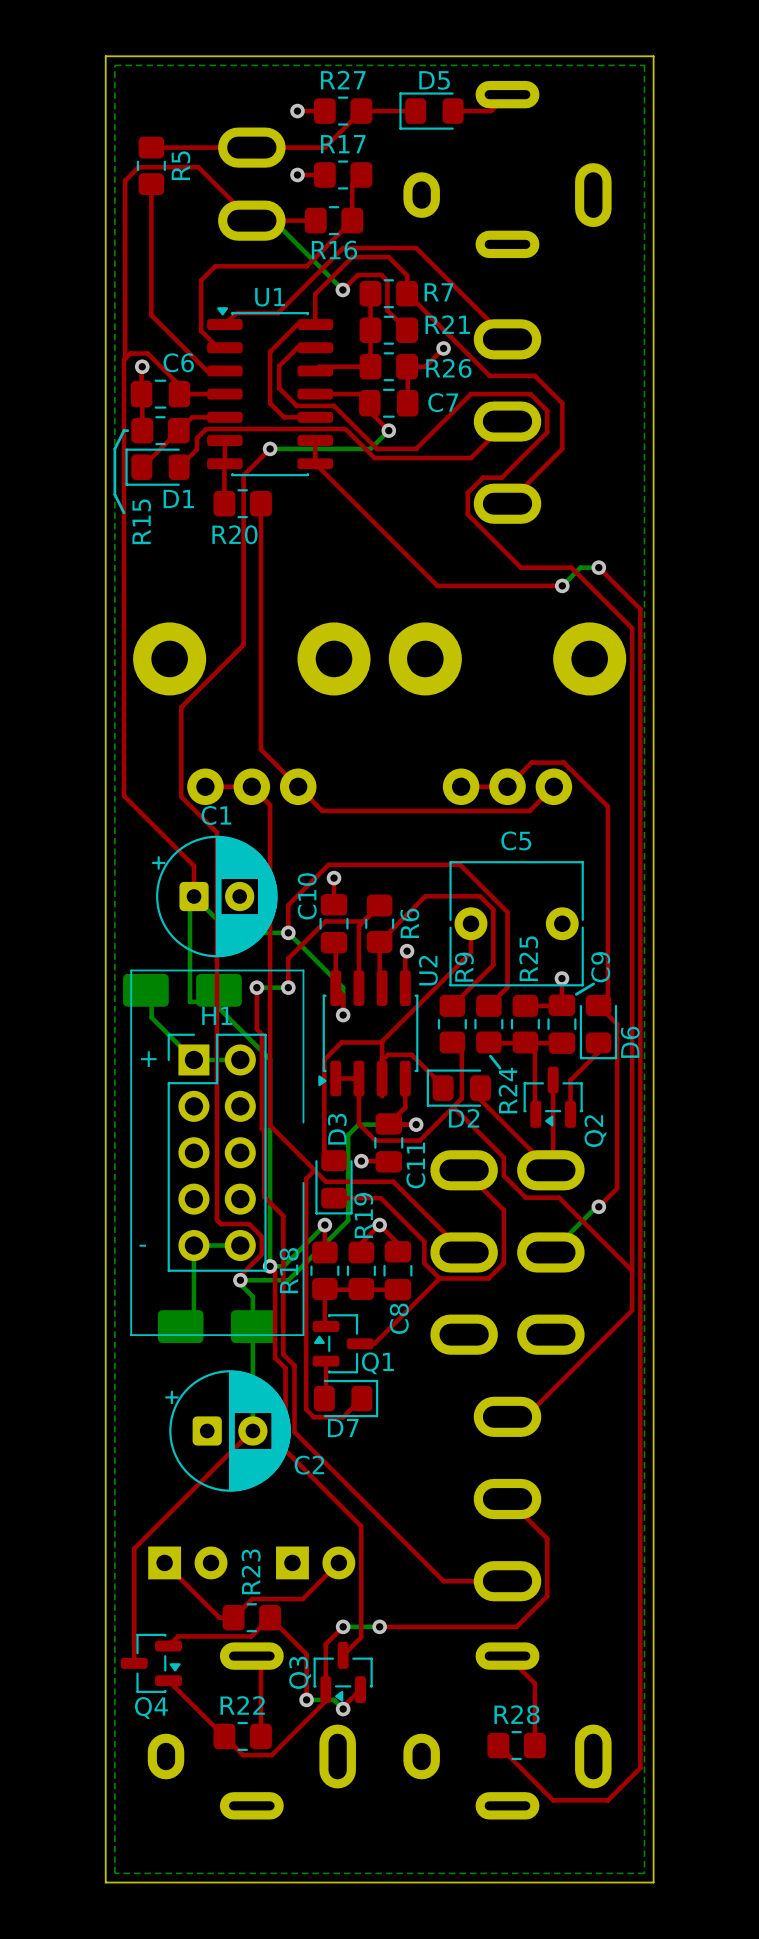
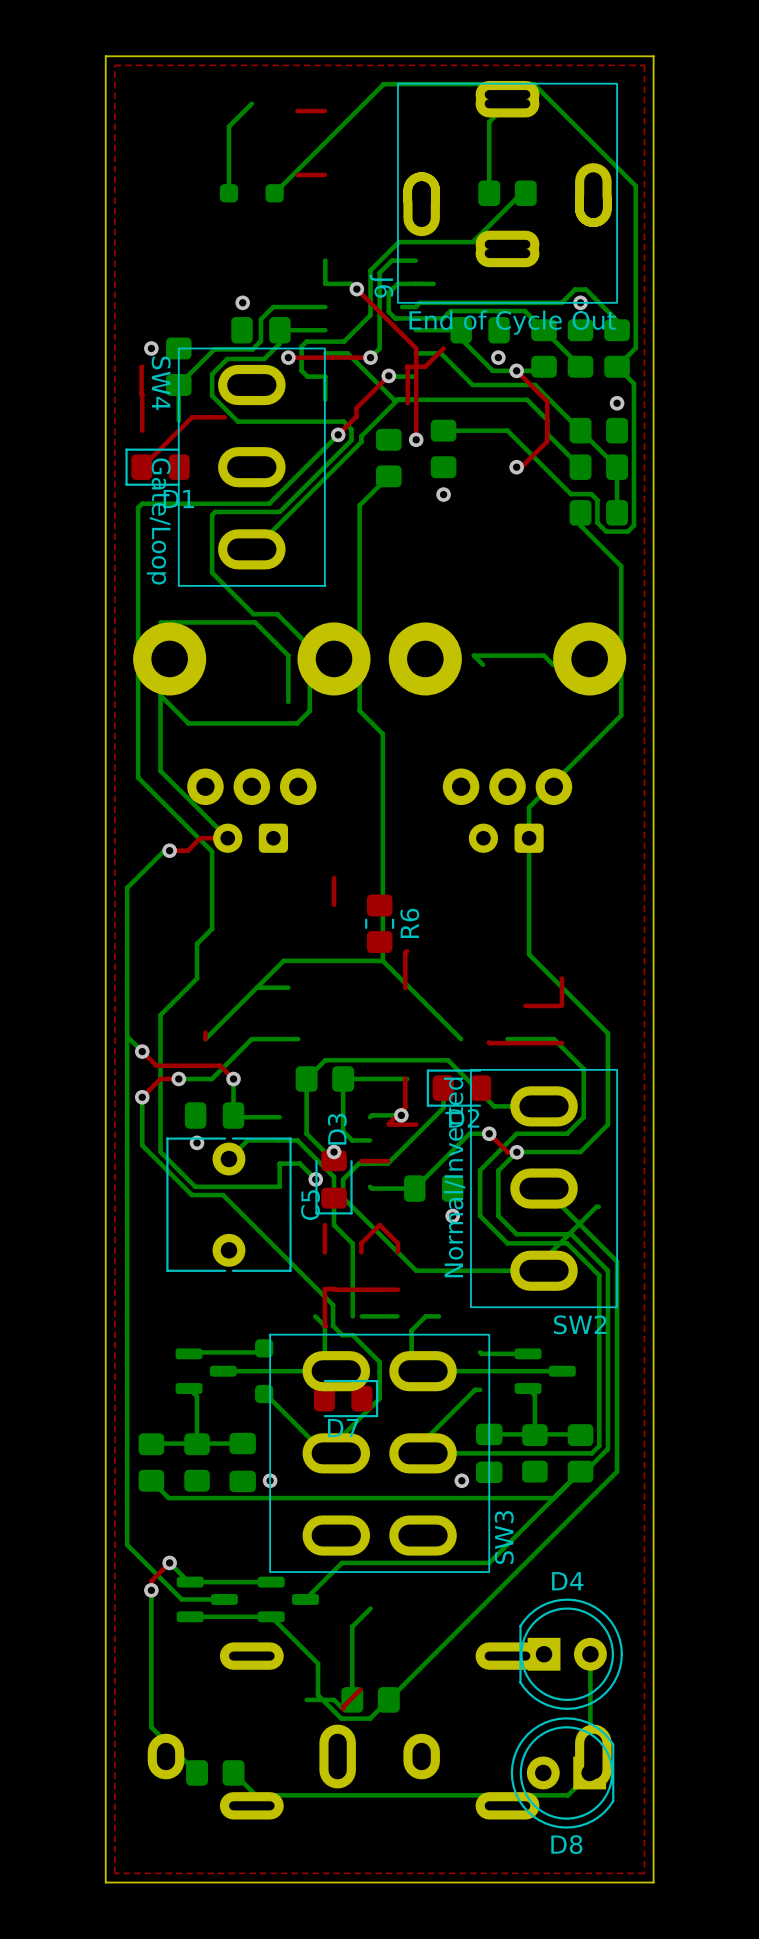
bottom zone outline: (114, 65) (644, 65) (644, 1873) (114, 1873) (114, 65) -> none
top zone outline: none -> (114, 65) (644, 65) (644, 1873) (114, 1873) (114, 65)
top track: (507, 94) (491, 111) (453, 111) -> none
bottom track: none -> (251, 103) (229, 126) (229, 193)
bottom track: none -> (507, 103) (489, 122) (489, 193)
via: (297, 111) -> none
R27 side: top (343, 111) -> bottom (443, 448)
top track: (415, 111) (361, 111) (324, 147) (151, 147) -> none
D5: (431, 111) -> none
part footprint: [218, 127, 286, 241] -> [219, 184, 284, 203]
R5: (151, 165) -> none
via: (297, 174) -> none
R17 side: top (343, 174) -> bottom (580, 348)
top track: (361, 174) (352, 184) (352, 220) (306, 266) (215, 266) (201, 280) (201, 330) (217, 347) (224, 347) -> none
top track: (151, 184) (151, 315) (207, 370) (224, 370) -> none
bottom track: none -> (274, 193) (383, 84) (533, 84) (635, 186) (635, 348) (617, 366) (633, 383) (633, 525) (627, 531) (606, 531) (597, 522) (597, 500) (591, 494) (570, 494) (507, 430) (443, 430)
J6: none -> End of Cycle Out (507, 193)
part: none -> (507, 193)
bottom track: none -> (525, 193) (521, 193) (472, 242) (398, 242) (370, 270) (370, 315) (344, 341) (306, 341) (301, 346) (301, 370) (307, 376) (325, 376) (325, 399)
bottom track: (251, 220) (273, 220) (342, 289) -> none
top track: (315, 220) (251, 220) (198, 167) (138, 167) (125, 180) (125, 358) -> none
R16 side: top (334, 220) -> bottom (544, 348)
bottom track: none -> (325, 260) (325, 283) (351, 283) (356, 289)
bottom track: none -> (415, 260) (391, 260) (379, 272) (379, 348) (370, 357)
bottom track: none -> (433, 283) (397, 283) (388, 292) (388, 311) (395, 318) (443, 318) (450, 311) (524, 311) (580, 366)
via position: (342, 289) -> (356, 289)
top track: none -> (356, 289) (416, 348) (416, 439)
top track: (343, 293) (342, 289) (357, 274) (381, 274) (387, 281) (387, 310) (407, 330) -> none
top track: (370, 293) (370, 366) (319, 366) (315, 370) -> none
R7 side: top (388, 293) -> bottom (598, 467)
via: none -> (242, 302)
via: none -> (580, 302)
bottom track: none -> (325, 307) (273, 307) (260, 319) (260, 341) (252, 349) (214, 349) (178, 385) (178, 420)
bottom track: none -> (402, 307) (415, 307) (419, 302) (561, 302) (575, 289) (586, 289) (617, 320) (617, 330)
top track: (224, 324) (236, 313) (278, 313) (343, 248) (416, 248) (507, 339) -> none
bottom track: none -> (325, 330) (279, 330) (279, 343) (264, 358) (227, 358) (212, 374) (212, 395) (237, 421) (343, 421) (351, 429) (351, 440) (279, 511) (215, 511) (212, 515) (212, 572) (253, 614) (277, 614) (309, 646) (309, 710) (297, 723) (188, 723) (160, 695) (160, 770) (227, 838)
R21 side: top (388, 330) -> bottom (598, 512)
bottom track: none -> (415, 330) (461, 330) (461, 339) (492, 370) (539, 370) (544, 366)
top track: (315, 347) (297, 347) (279, 366) (279, 388) (296, 405) (334, 405) (377, 448) (416, 448) (470, 394) (530, 394) (547, 410) -> (516, 370) (547, 401) (547, 410)
via: (443, 348) -> none
part: none -> (617, 348)
bottom track: none -> (325, 353) (347, 353) (394, 399) (527, 399) (547, 419) (547, 433) (580, 467)
bottom track: none -> (415, 353) (441, 353) (472, 385) (534, 385) (617, 467)
top track: none -> (288, 357) (370, 357)
via: none -> (288, 357)
via: none -> (370, 357)
via: none -> (498, 357)
via position: (142, 366) -> (151, 348)
R26 side: top (388, 366) -> bottom (598, 430)
via: none -> (516, 370)
top track: none -> (388, 375) (356, 408) (356, 416) (338, 434)
bottom track: none -> (388, 375) (415, 376)
via: none -> (388, 375)
U1: (270, 391) -> none
C6 side: top (160, 394) -> bottom (480, 330)
top track: (224, 394) (179, 394) (179, 385) (147, 353) (130, 353) (123, 359) (123, 795) (194, 865) (194, 896) -> none
top track: (315, 394) (360, 394) (369, 403) (369, 411) (388, 430) -> none
bottom track: none -> (397, 399) (361, 436) (361, 442) (254, 549) (251, 549)
C7 side: top (388, 403) -> bottom (260, 330)
via: none -> (617, 403)
top track: (315, 417) (284, 417) (270, 403) (270, 351) (297, 324) (315, 324) (315, 294) (352, 257) (388, 257) (407, 275) (407, 293) (489, 375) (534, 375) (562, 403) (562, 448) (507, 503) -> none
top track: (507, 421) (470, 458) (374, 458) (345, 429) (206, 429) (197, 438) (197, 449) (179, 467) -> none
SW4 side: bottom (507, 421) -> top (251, 467)
line: (127, 430) (123, 430) (114, 448) (114, 494) (123, 512) -> none
R15 side: top (160, 430) -> bottom (178, 366)
bottom track: (388, 430) (370, 448) (270, 448) -> none
via: (388, 430) -> none
top track: (547, 432) (501, 477) (483, 477) (467, 492) (467, 514) (520, 567) (571, 567) (632, 628) (632, 1310) (525, 1416) (507, 1416) -> (547, 432) (547, 441) (521, 467) (516, 467)
bottom track: none -> (338, 434) (269, 503) (142, 503) (138, 507) (138, 777) (212, 851) (212, 928) (197, 943) (197, 978) (160, 1015) (160, 1152) (195, 1186) (279, 1186) (279, 1163) (299, 1163) (315, 1179)
via: none -> (338, 434)
via: none -> (416, 439)
top track: (224, 440) (224, 503) -> none
top track: (315, 440) (315, 463) (437, 585) (562, 585) -> none
top track: (270, 448) (243, 475) (243, 645) (181, 707) (181, 796) (216, 832) (216, 1219) (221, 1224) (249, 1224) (261, 1236) (261, 1254) (240, 1275) (240, 1280) -> none
via: (270, 448) -> none
bottom track: none -> (617, 460) (617, 503)
via: none -> (516, 467)
bottom track: none -> (388, 476) (359, 505) (359, 710) (382, 734) (382, 960)
via: none -> (443, 494)
R20 side: top (242, 503) -> bottom (388, 458)
top track: (260, 503) (260, 749) (322, 810) (529, 810) (553, 786) -> none
bottom track: none -> (580, 512) (580, 525) (621, 566) (621, 715) (529, 807) (529, 954) (607, 1033) (607, 1124) (580, 1152) (517, 1152) (498, 1170) (498, 1215) (516, 1234) (571, 1234) (607, 1270) (607, 1448) (585, 1471) (580, 1471) (489, 1562) (342, 1562) (305, 1599)
top track: (598, 567) (640, 609) (640, 1767) (607, 1800) (553, 1800) (498, 1745) -> none
bottom track: (598, 567) (580, 567) (562, 585) -> none
via: (598, 567) -> none
via: (562, 585) -> none
bottom track: none -> (160, 622) (255, 622) (288, 655) (288, 702)
bottom track: none -> (483, 664) (473, 655) (544, 655) (553, 664) (598, 664)
top track: (205, 786) (251, 786) (270, 805) (270, 1125) (314, 1170) -> none
top track: (461, 786) (507, 786) (531, 762) (563, 762) (607, 806) (607, 1005) -> none
top track: none -> (227, 838) (200, 838) (187, 850) (169, 850)
part: none -> (250, 838)
bottom track: none -> (169, 850) (164, 850) (127, 887) (127, 1544) (181, 1599) (224, 1599)
via: none -> (169, 850)
via: (334, 878) -> none
C1 side: top (214, 896) -> bottom (506, 838)
top track: (379, 905) (358, 926) (358, 988) -> none
top track: (363, 921) (325, 921) (288, 958) (288, 987) -> none
C10 side: top (334, 923) -> bottom (433, 1188)
top track: (470, 923) (470, 952) (382, 1041) (382, 1096) -> none
C5 rotation: 0° (516, 923) -> 90° clockwise (228, 1204)
C5 position: (516, 923) -> (228, 1204)
top track: (288, 932) (288, 905) (328, 864) (460, 864) (507, 912) (507, 987) (488, 1005) -> none
via: (288, 932) -> none
top track: (334, 942) (335, 944) (335, 988) (343, 995) (343, 1015) -> none
via: (407, 951) -> none
bottom track: none -> (382, 960) (283, 960) (205, 1039)
bottom track: none -> (382, 960) (461, 1039)
via: (561, 978) -> none
line: (593, 983) (576, 994) -> none
top track: (256, 987) (251, 987) (256, 992) (256, 1029) (261, 1034) (264, 1196) (283, 1215) (283, 1354) (294, 1365) (294, 1432) (443, 1581) (507, 1581) -> none
via: (256, 987) -> none
via: (288, 987) -> none
top track: (382, 988) (379, 985) (379, 942) (425, 896) (480, 896) (493, 909) (493, 964) (452, 1005) (461, 1005) -> none
part: (182, 990) -> none
bottom track: (151, 1001) (151, 1017) (193, 1059) (240, 1059) -> none
top track: (598, 1005) (617, 1024) (617, 1188) (598, 1206) -> none
bottom track: (343, 1015) (343, 987) (288, 932) (230, 932) (194, 896) (190, 900) (190, 1001) (212, 1001) (270, 1059) (270, 1266) (283, 1266) (324, 1225) -> none
via: (343, 1015) -> none
R9 side: top (452, 1024) -> bottom (324, 1078)
R24: (488, 1024) -> none
R25: (525, 1024) -> none
C9: (561, 1024) -> none
D6: (598, 1027) -> none
top track: none -> (205, 1032) (205, 1039)
U2: (368, 1033) -> none
bottom track: none -> (127, 1036) (142, 1051)
bottom track: none -> (298, 1039) (251, 1039) (211, 1078) (178, 1078)
bottom track: none -> (507, 1039) (553, 1039) (583, 1068) (583, 1117) (567, 1133) (516, 1133) (480, 1170) (480, 1215) (507, 1243) (567, 1243) (599, 1275) (599, 1445) (591, 1453) (411, 1453) (475, 1389) (480, 1389)
top track: (382, 1042) (341, 1042) (324, 1059) (324, 1151) (334, 1160) -> none
top track: (461, 1042) (461, 1098) (419, 1140) (375, 1140) (358, 1123) (358, 1078) (335, 1078) -> none
top track: (534, 1042) (535, 1114) -> none
top track: (607, 1042) (570, 1080) (570, 1114) -> none
top track: none -> (142, 1051) (156, 1065) (220, 1065) (233, 1079)
via: none -> (142, 1051)
line: (490, 1056) (500, 1068) -> none
top track: (382, 1060) (388, 1054) (411, 1054) (443, 1088) -> none
top track: none -> (178, 1078) (160, 1078) (142, 1097)
via: none -> (178, 1078)
bottom track: none -> (407, 1078) (343, 1078) (343, 1131) (352, 1140) (370, 1140)
bottom track: none -> (233, 1079) (233, 1115) (235, 1117) (279, 1117)
via: none -> (233, 1079)
top track: (553, 1080) (553, 1168) (550, 1170) (480, 1099) (480, 1088) -> none
bottom track: none -> (443, 1088) (443, 1107) (387, 1163) (358, 1163) (343, 1179) (343, 1197) (416, 1270) (544, 1270)
bottom track: none -> (142, 1097) (142, 1145) (191, 1195) (223, 1195) (333, 1305) (333, 1325) (342, 1335) (352, 1335) (379, 1362) (379, 1398) (324, 1453) (270, 1398) (270, 1389)
via: none -> (142, 1097)
Q2 side: top (553, 1097) -> bottom (206, 1371)
bottom track: none -> (544, 1106) (494, 1106) (448, 1060) (325, 1060) (306, 1078) (306, 1133) (324, 1152) (334, 1152)
top track: (453, 1107) (503, 1157) (503, 1175) (525, 1197) (559, 1197) (632, 1270) -> none
bottom track: none -> (401, 1115) (371, 1115) (370, 1117)
bottom track: (416, 1124) (358, 1124) (348, 1135) (348, 1220) (288, 1280) (240, 1280) (240, 1284) (252, 1296) (252, 1430) -> none
via position: (416, 1124) -> (401, 1115)
top track: none -> (489, 1133) (507, 1152) (516, 1152)
bottom track: none -> (489, 1133) (469, 1133) (414, 1188) (371, 1188) (370, 1186)
via: none -> (489, 1133)
via: none -> (197, 1142)
C11 side: top (388, 1142) -> bottom (214, 1115)
H1: (217, 1152) -> none
via: none -> (334, 1152)
via: none -> (516, 1152)
bottom track: none -> (228, 1159) (247, 1140) (297, 1140) (334, 1176) (334, 1225) (352, 1243) (352, 1316)
via: (361, 1161) -> none
top track: (314, 1170) (306, 1178) (306, 1409) (314, 1417) (343, 1417) (361, 1398) -> none
top track: (314, 1170) (325, 1181) (393, 1181) (464, 1252) (433, 1252) -> none
top track: (464, 1170) (503, 1210) (503, 1263) (488, 1278) (439, 1278) -> none
via: none -> (315, 1179)
bottom track: none -> (544, 1188) (617, 1261) (617, 1471) (370, 1718) (341, 1718) (318, 1695) (318, 1663) (271, 1616) (190, 1616)
top track: (334, 1198) (380, 1198) (424, 1241) (424, 1263) (439, 1278) -> none
via: (598, 1206) -> none
via: none -> (452, 1215)
via: (324, 1225) -> none
via: (379, 1225) -> none
bottom track: (240, 1245) (193, 1245) (193, 1313) (180, 1326) -> none
SW3 side: bottom (507, 1252) -> top (379, 1453)
via: (270, 1266) -> none
top track: (270, 1270) (270, 1266) (275, 1271) (275, 1357) (285, 1368) (285, 1450) (361, 1526) (361, 1637) (343, 1655) -> none
R18 side: top (324, 1270) -> bottom (580, 1453)
R19 side: top (361, 1270) -> bottom (534, 1453)
C8 side: top (397, 1270) -> bottom (489, 1453)
top track: (439, 1278) (374, 1343) (360, 1343) -> none
via: (240, 1280) -> none
bottom track: none -> (315, 1316) (324, 1325) (324, 1371) (223, 1371)
bottom track: none -> (361, 1316) (397, 1316)
bottom track: none -> (439, 1316) (425, 1316) (411, 1330) (411, 1371) (562, 1371)
part: (217, 1326) -> none
Q1 side: top (343, 1343) -> bottom (545, 1371)
bottom track: none -> (264, 1352) (189, 1353)
bottom track: none -> (480, 1352) (528, 1353)
top track: (326, 1361) (326, 1396) (324, 1398) -> none
part: none -> (264, 1371)
bottom track: none -> (189, 1388) (197, 1396) (197, 1444)
bottom track: none -> (528, 1388) (534, 1395) (534, 1435)
C2: (227, 1430) -> none
top track: (252, 1430) (134, 1548) (134, 1663) -> none
bottom track: none -> (489, 1434) (580, 1435)
bottom track: none -> (242, 1443) (151, 1444)
part: none -> (151, 1462)
part: none -> (197, 1462)
part: none -> (242, 1462)
bottom track: none -> (151, 1480) (168, 1498) (554, 1498)
via: none -> (270, 1480)
via: none -> (461, 1480)
top track: (507, 1499) (547, 1538) (547, 1596) (516, 1626) (379, 1626) -> none
SW2 side: bottom (507, 1499) -> top (544, 1188)
top track: (164, 1562) (219, 1617) (233, 1617) (252, 1599) (302, 1599) (338, 1562) -> none
top track: none -> (169, 1562) (151, 1581) (151, 1590)
bottom track: none -> (169, 1562) (188, 1582) (271, 1582)
via: none -> (169, 1562)
D8 side: bottom (187, 1562) -> top (562, 1772)
D4 side: bottom (315, 1562) -> top (571, 1654)
bottom track: none -> (151, 1590) (151, 1727) (197, 1772)
via: none -> (151, 1590)
bottom track: none -> (370, 1608) (352, 1626) (352, 1699)
R23 side: top (251, 1617) -> bottom (215, 1772)
top track: (343, 1626) (325, 1644) (325, 1701) (271, 1755) (243, 1755) (168, 1680) -> none
bottom track: (343, 1626) (379, 1626) -> none
via: (343, 1626) -> none
via: (379, 1626) -> none
top track: (168, 1646) (178, 1636) (251, 1636) (270, 1617) (306, 1654) (306, 1699) -> none
bottom track: none -> (590, 1654) (590, 1772) (568, 1795) (255, 1795) (233, 1772)
top track: (251, 1656) (260, 1665) (260, 1736) -> none
top track: (507, 1656) (534, 1683) (534, 1745) -> none
Q4 side: top (151, 1663) -> bottom (207, 1599)
Q3 side: top (343, 1672) -> bottom (288, 1599)
via: (306, 1699) -> none
via: (343, 1709) -> none
R22 side: top (242, 1736) -> bottom (370, 1699)
R28: (516, 1745) -> none

